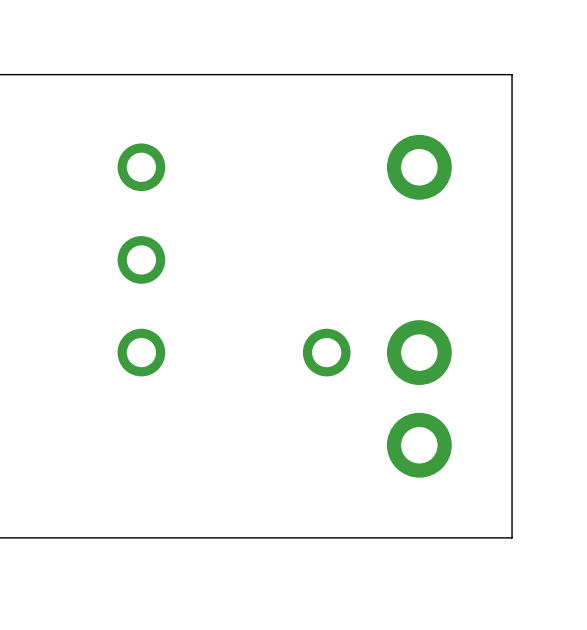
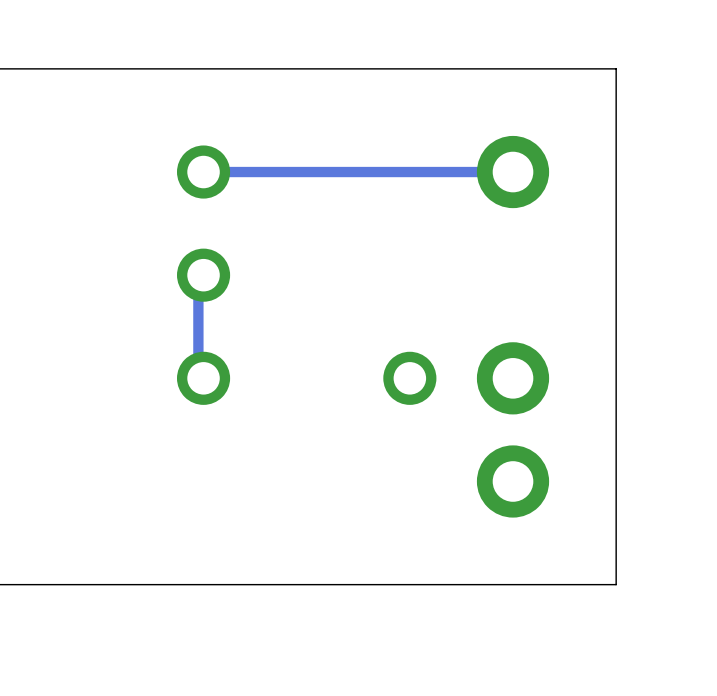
track: none -> (513, 172) (203, 172)
track: none -> (203, 275) (198, 278) (198, 378)

